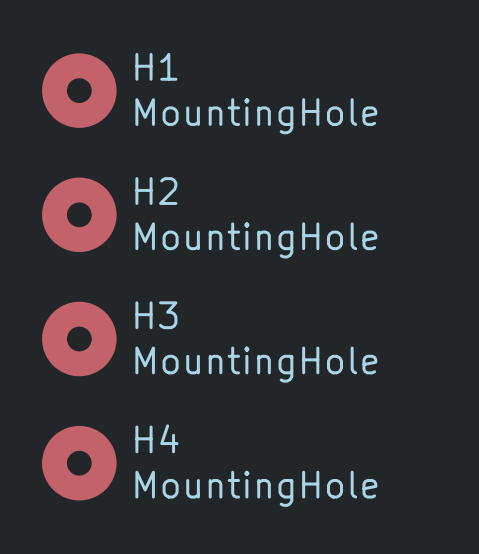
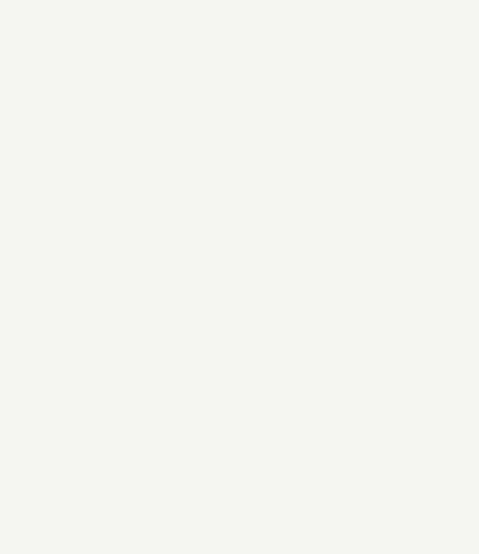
H1: MountingHole (79, 90) -> none
H2: MountingHole (79, 214) -> none
H3: MountingHole (79, 339) -> none
H4: MountingHole (79, 463) -> none

